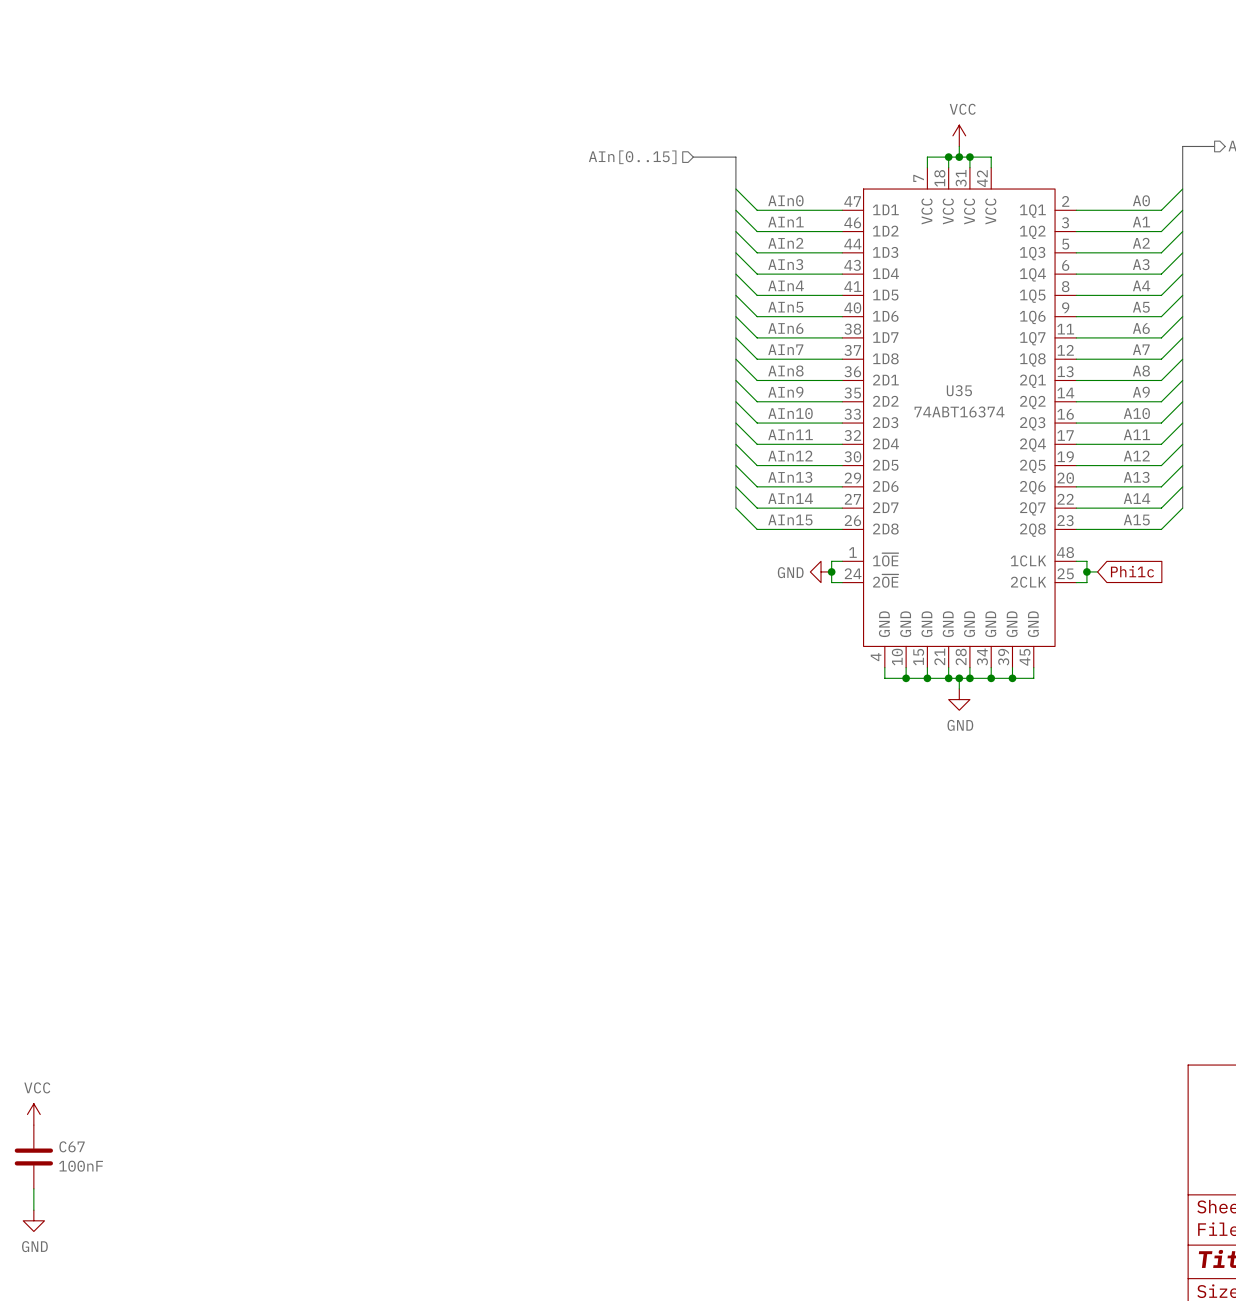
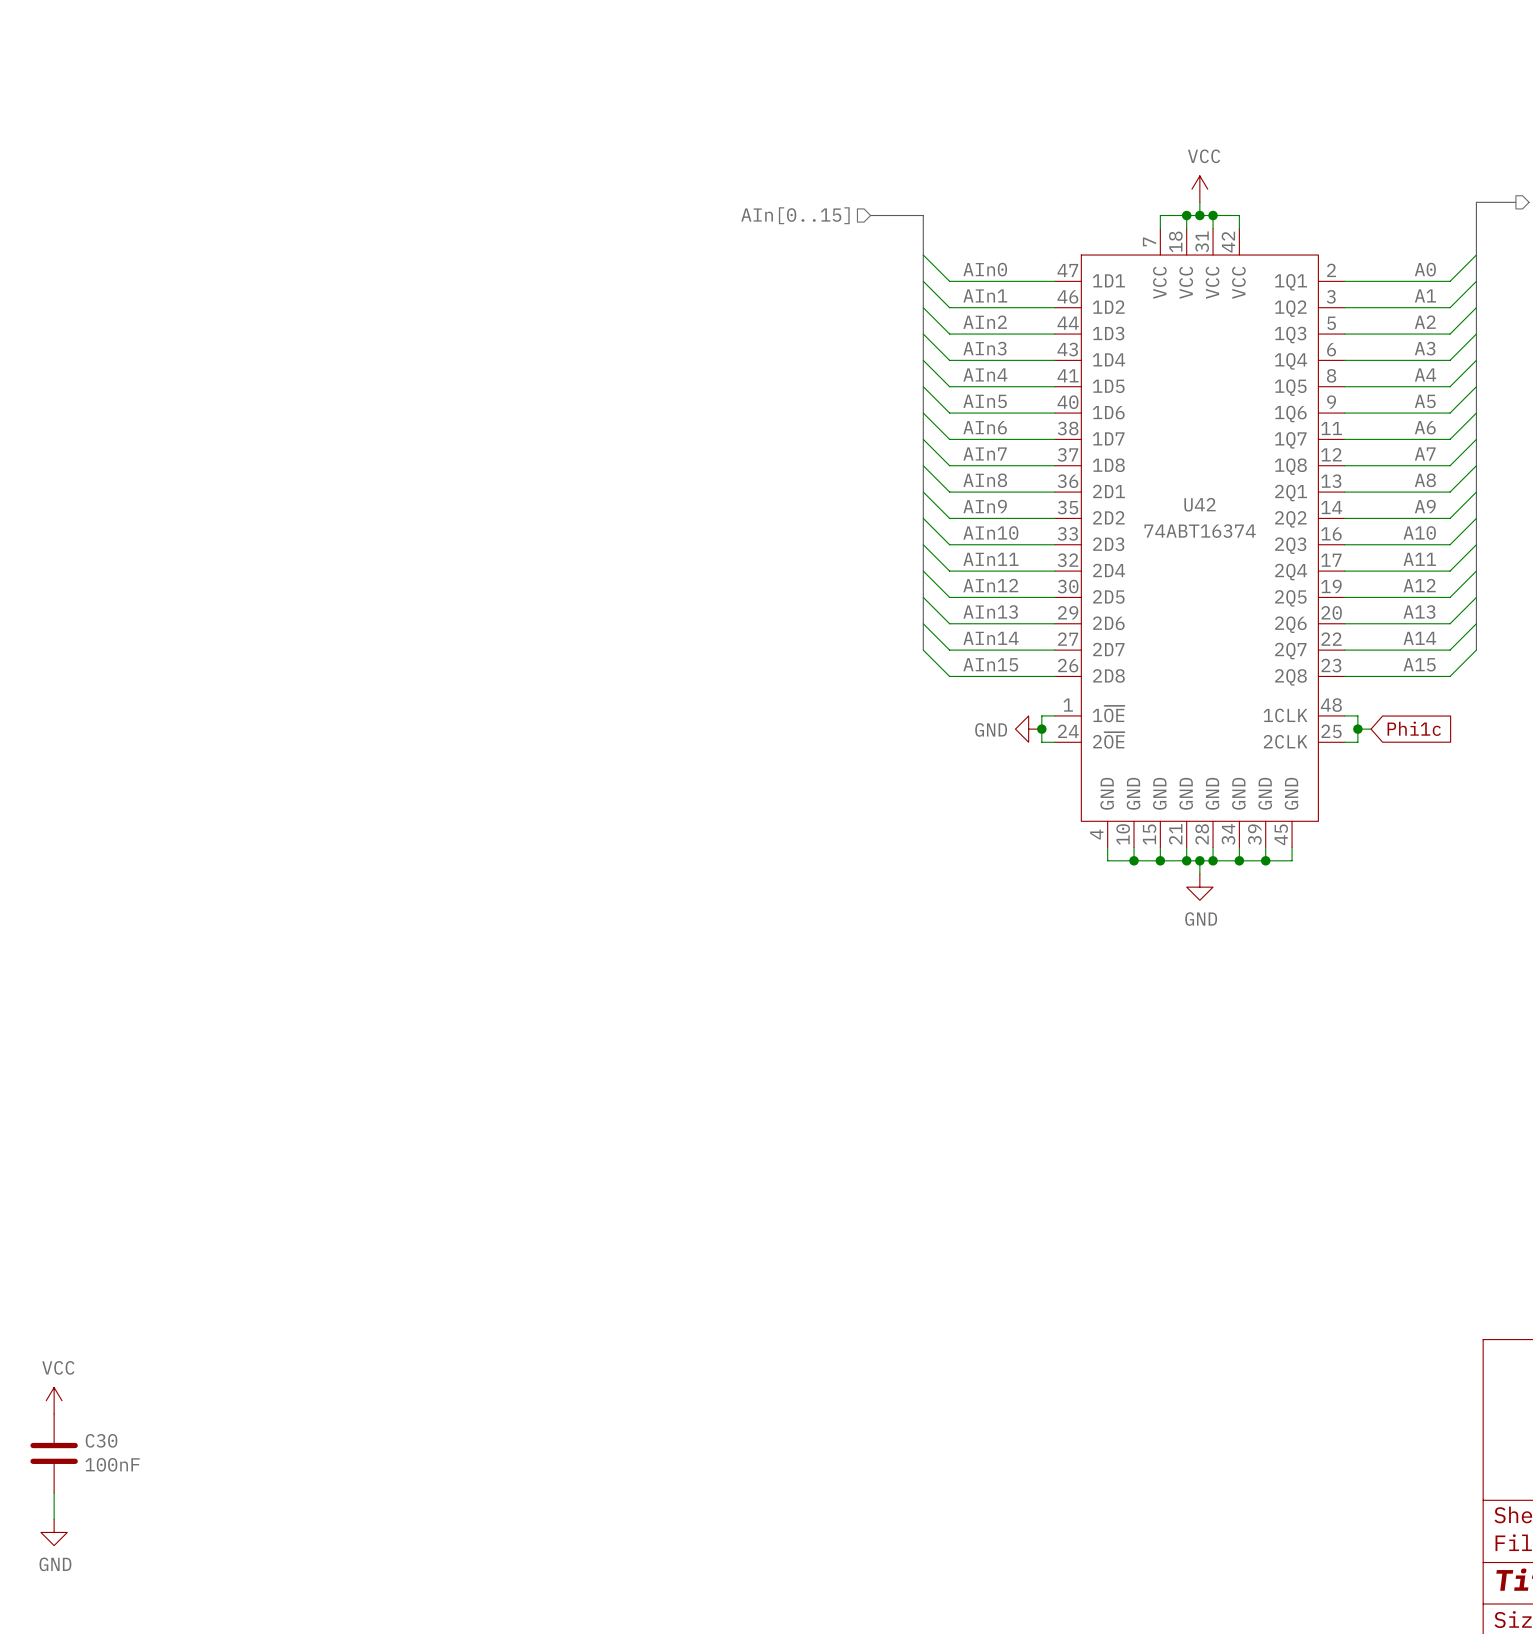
U35 name: U35 (959, 390) -> U42 (1200, 504)
C67 name: C67 (72, 1146) -> C30 (101, 1440)

